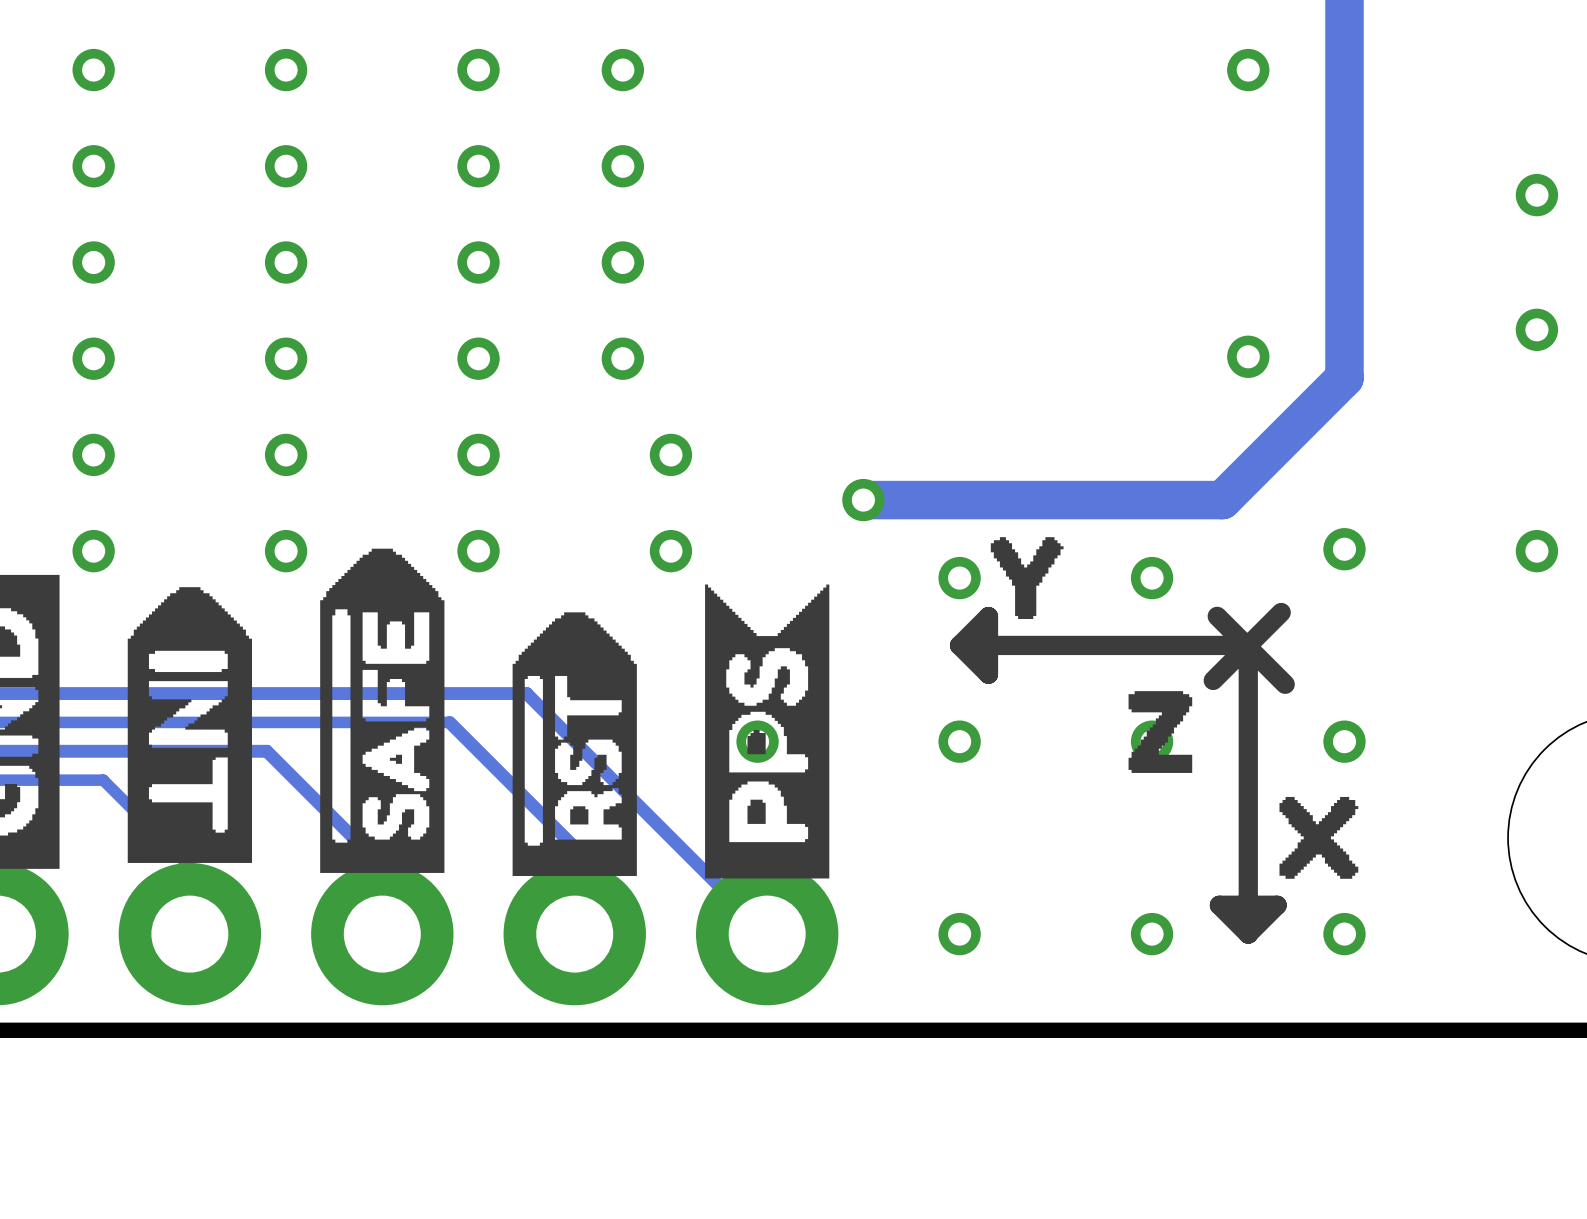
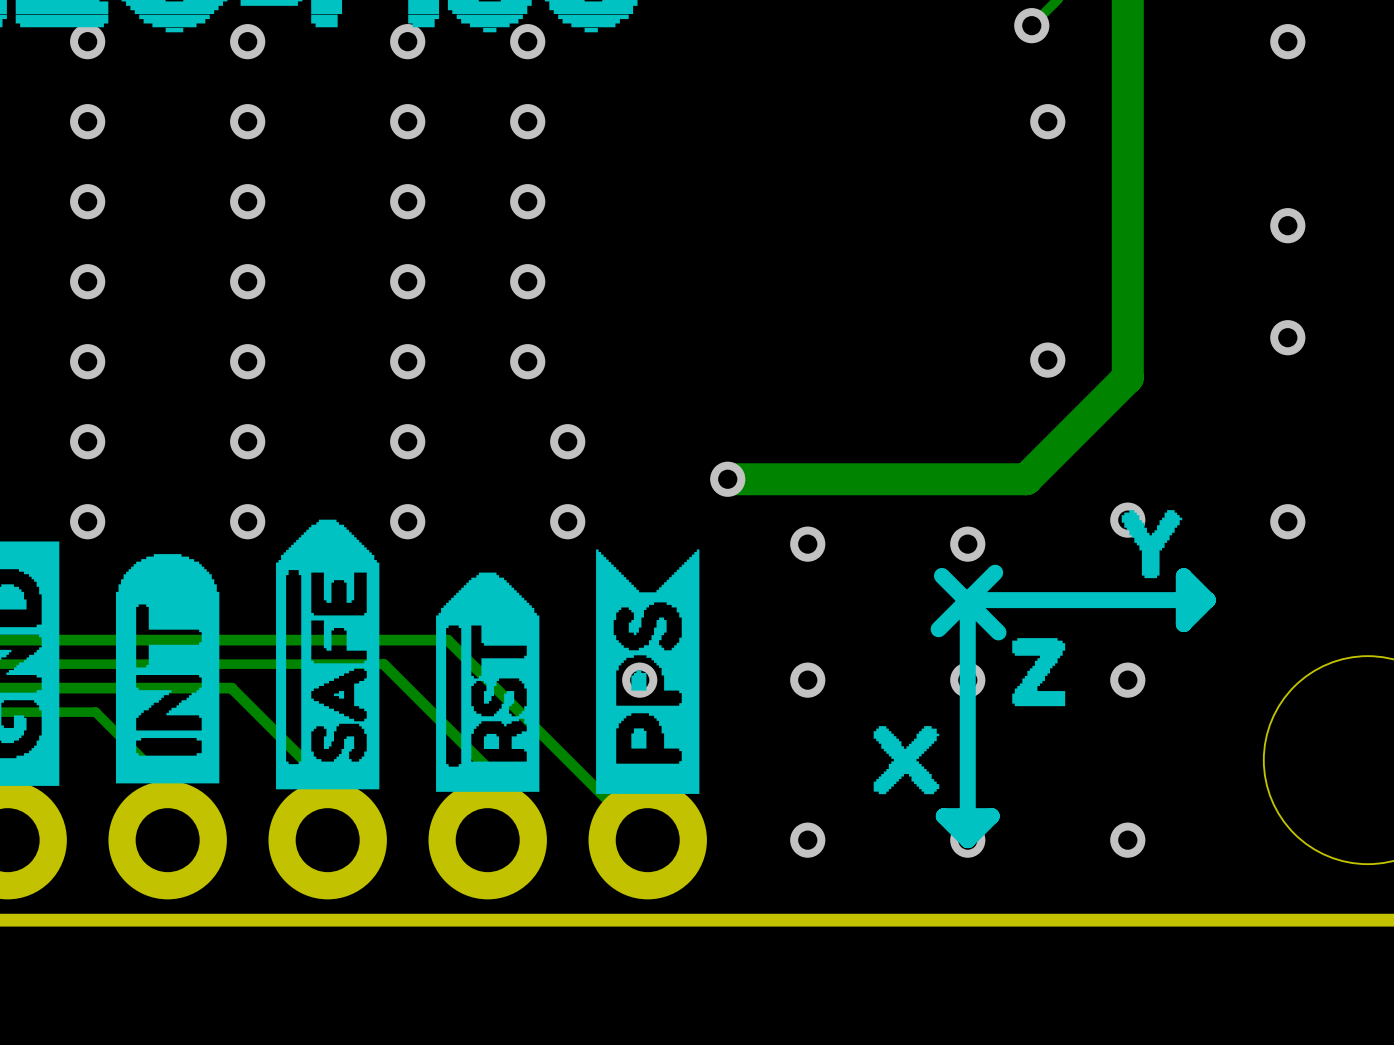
drawing position: (1027, 578) -> (1151, 544)
drawing shape: [127, 587, 252, 863] -> [116, 554, 220, 784]
line: (1281, 612) (1213, 680) -> (995, 572) (938, 629)
line: (1217, 616) (1285, 684) -> (941, 575) (998, 632)
line: (959, 645) (988, 674) (988, 616) (959, 645) -> none
line: (1152, 645) (959, 645) -> (967, 600) (967, 840)
line: (1248, 645) (1248, 934) -> (1047, 600) (1207, 600)
line: none -> (1207, 600) (1183, 624) (1183, 576) (1207, 600)
drawing position: (1160, 732) -> (1038, 672)
drawing position: (1318, 837) -> (906, 760)
line: (1248, 934) (1219, 905) (1277, 905) (1248, 934) -> (967, 840) (943, 816) (991, 816) (967, 840)

